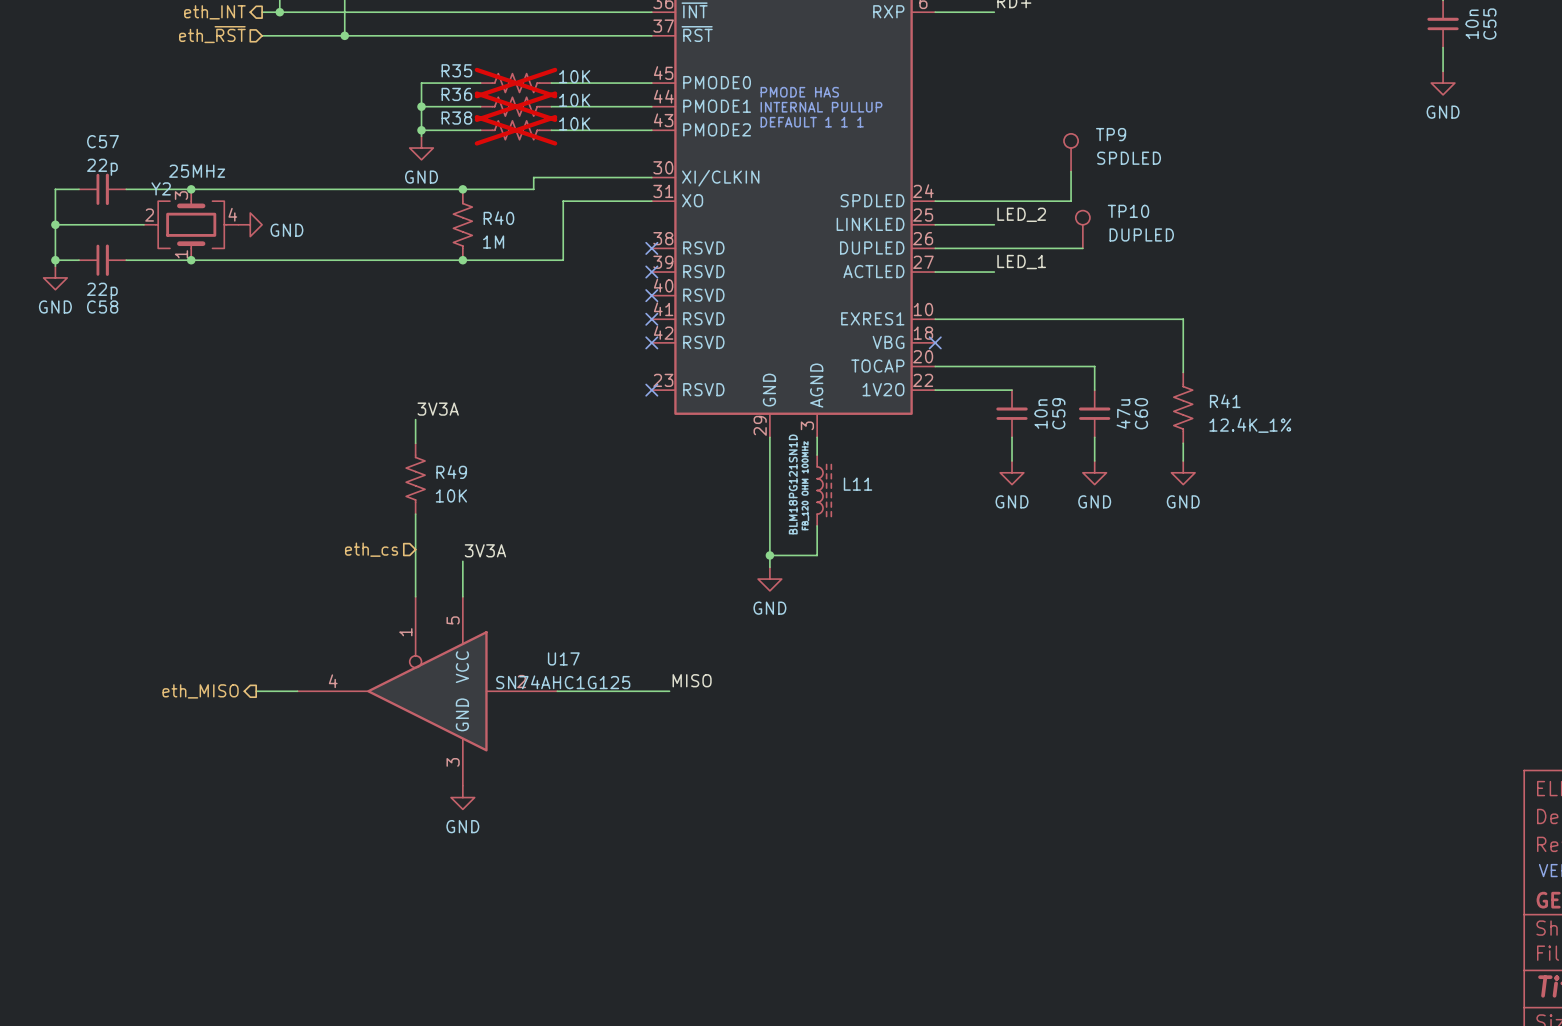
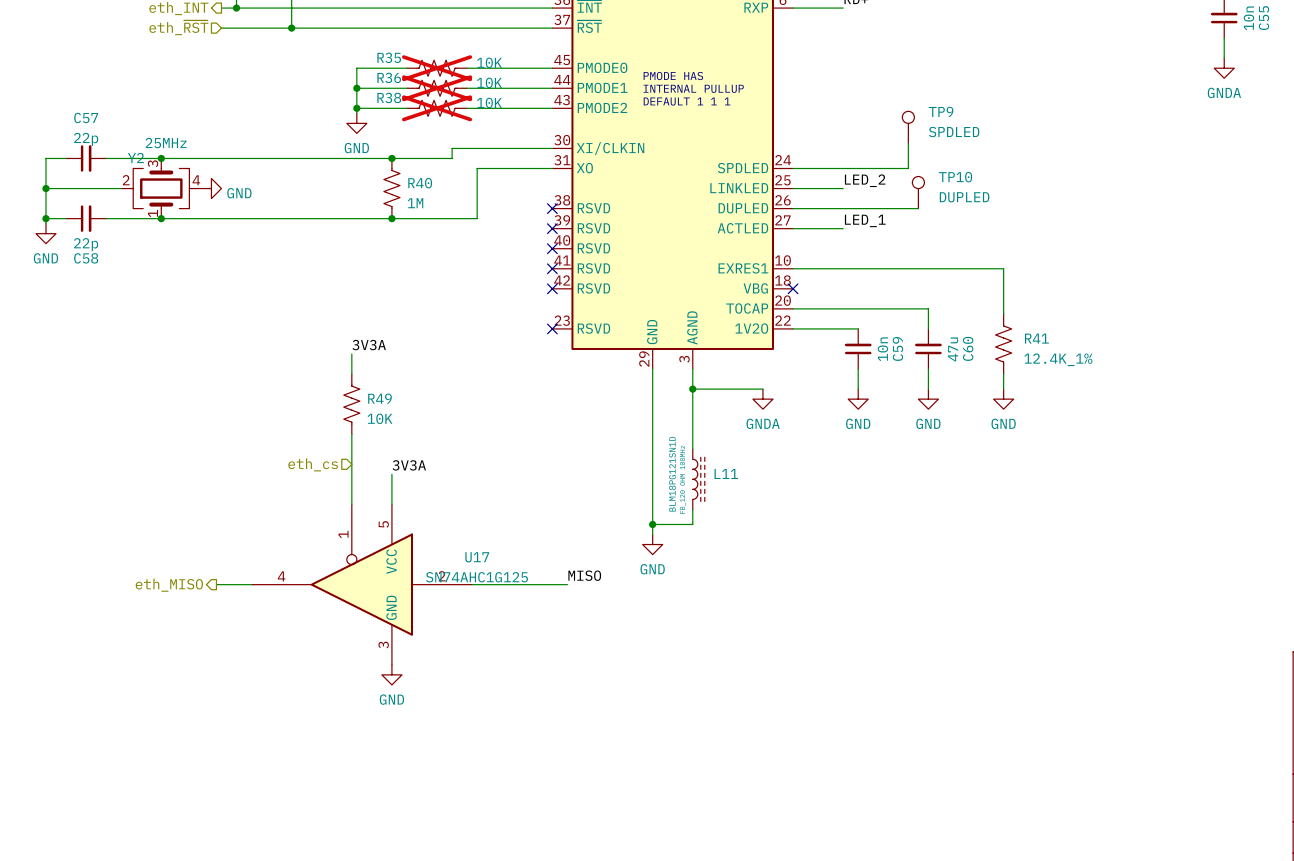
power symbol: GND (1443, 83) -> GNDA (1224, 68)
wire: none -> (692, 384) (692, 444)
wire: none -> (692, 389) (762, 389)
junction: none -> (692, 389)
power symbol: none -> GNDA (762, 399)
L11 position: (824, 490) -> (698, 479)
wire: (817, 531) (817, 555) (769, 555) -> none
junction: (769, 555) -> none
wire: none -> (652, 479) (652, 534)
power symbol position: GND (769, 579) -> GND (652, 544)
wire: none -> (692, 509) (692, 524) (652, 524)
junction: none -> (652, 524)

